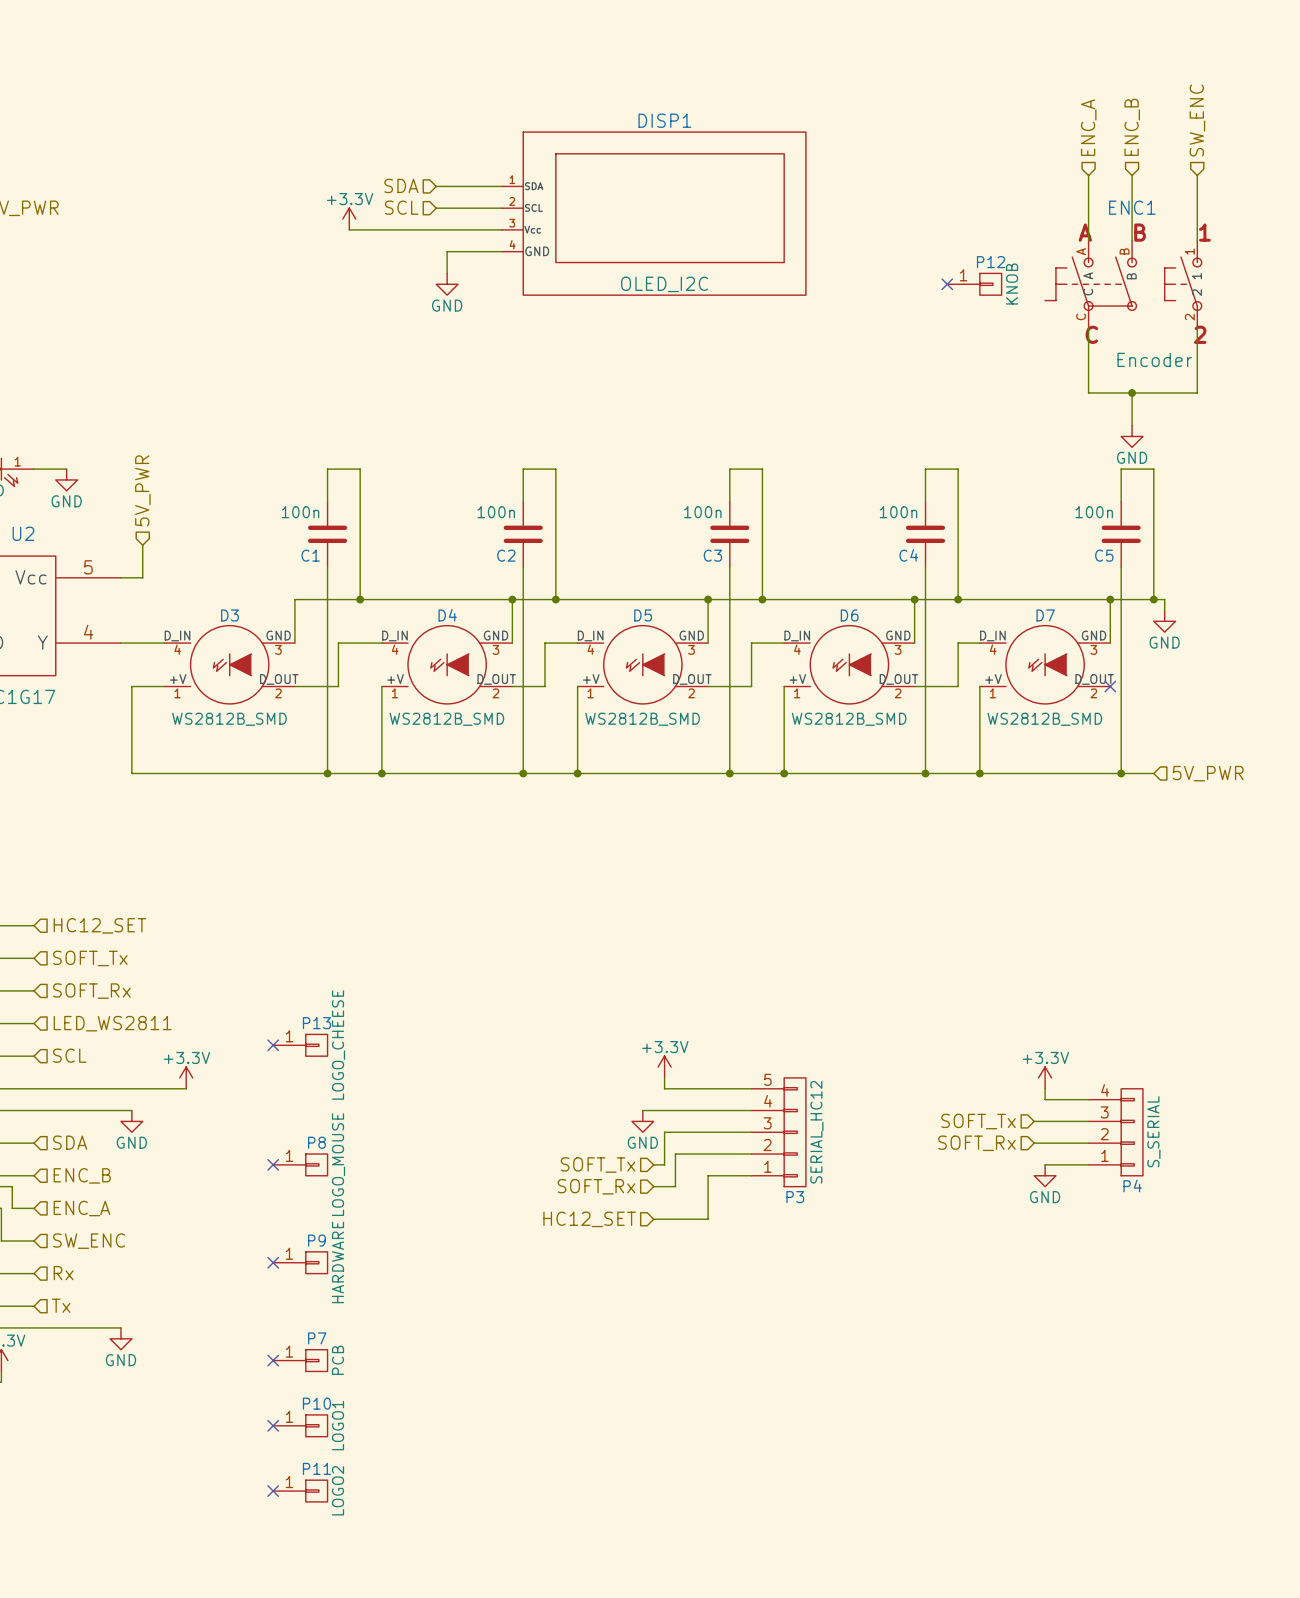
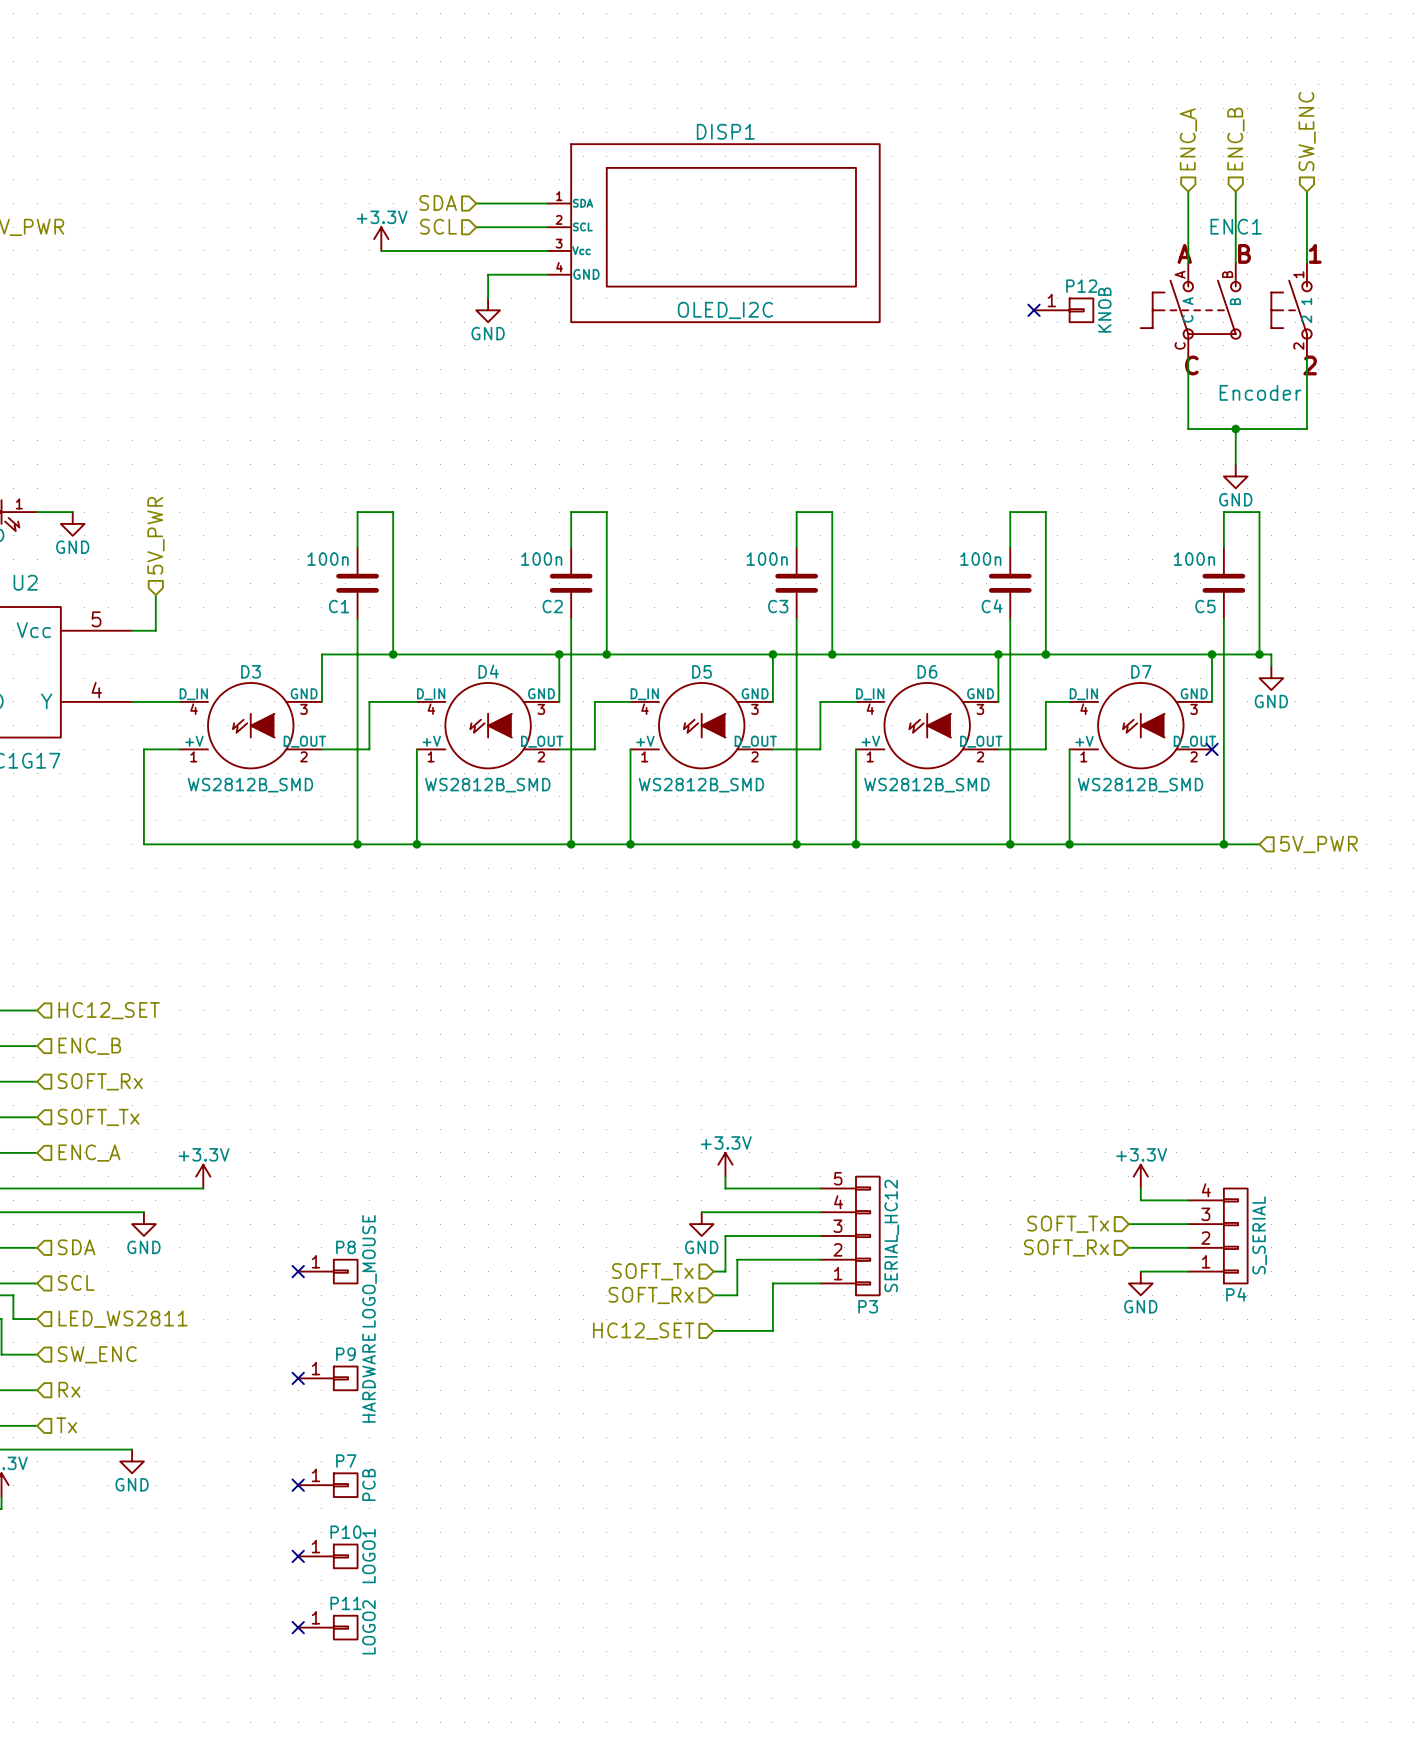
hierarchical label: SOFT_Tx (90, 958) -> ENC_B (89, 1046)
hierarchical label: LED_WS2811 (112, 1023) -> SOFT_Tx (98, 1117)
no-connect mark: (273, 1045) -> none
P13: LOGO_CHEESE (300, 1045) -> none
hierarchical label: SCL (69, 1055) -> ENC_A (89, 1153)
hierarchical label: ENC_B (82, 1175) -> SCL (76, 1282)
hierarchical label: ENC_A (81, 1208) -> LED_WS2811 (123, 1319)

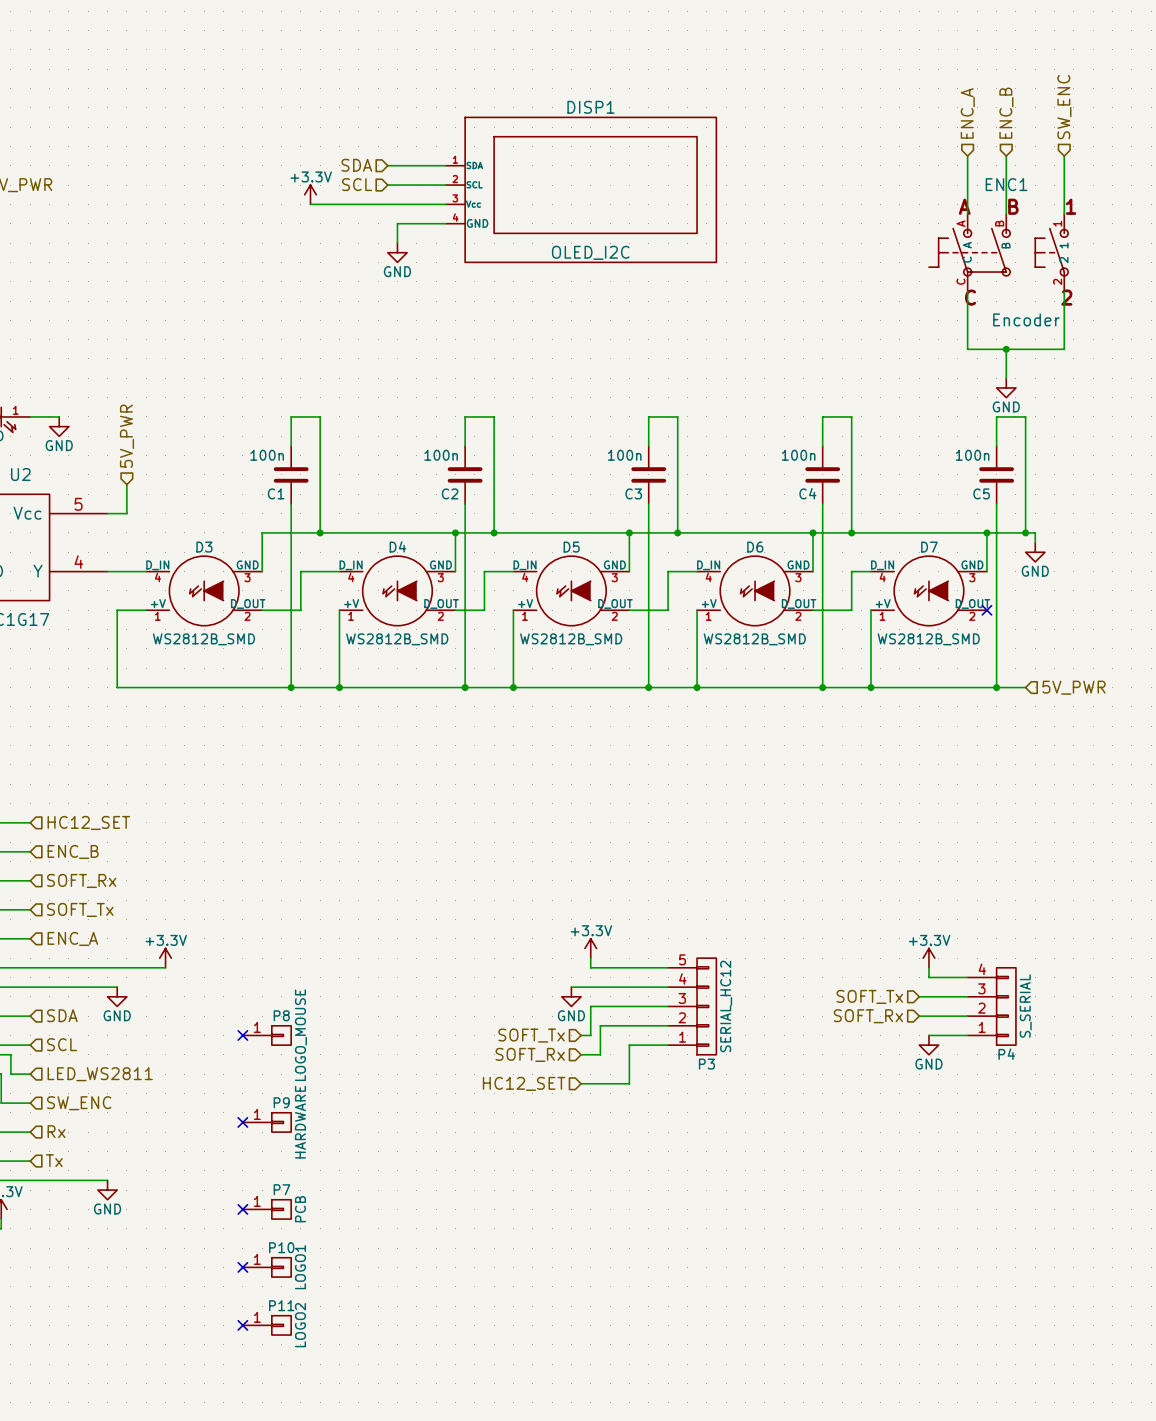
no-connect mark: (1034, 310) -> none
P12: KNOB (1063, 310) -> none

